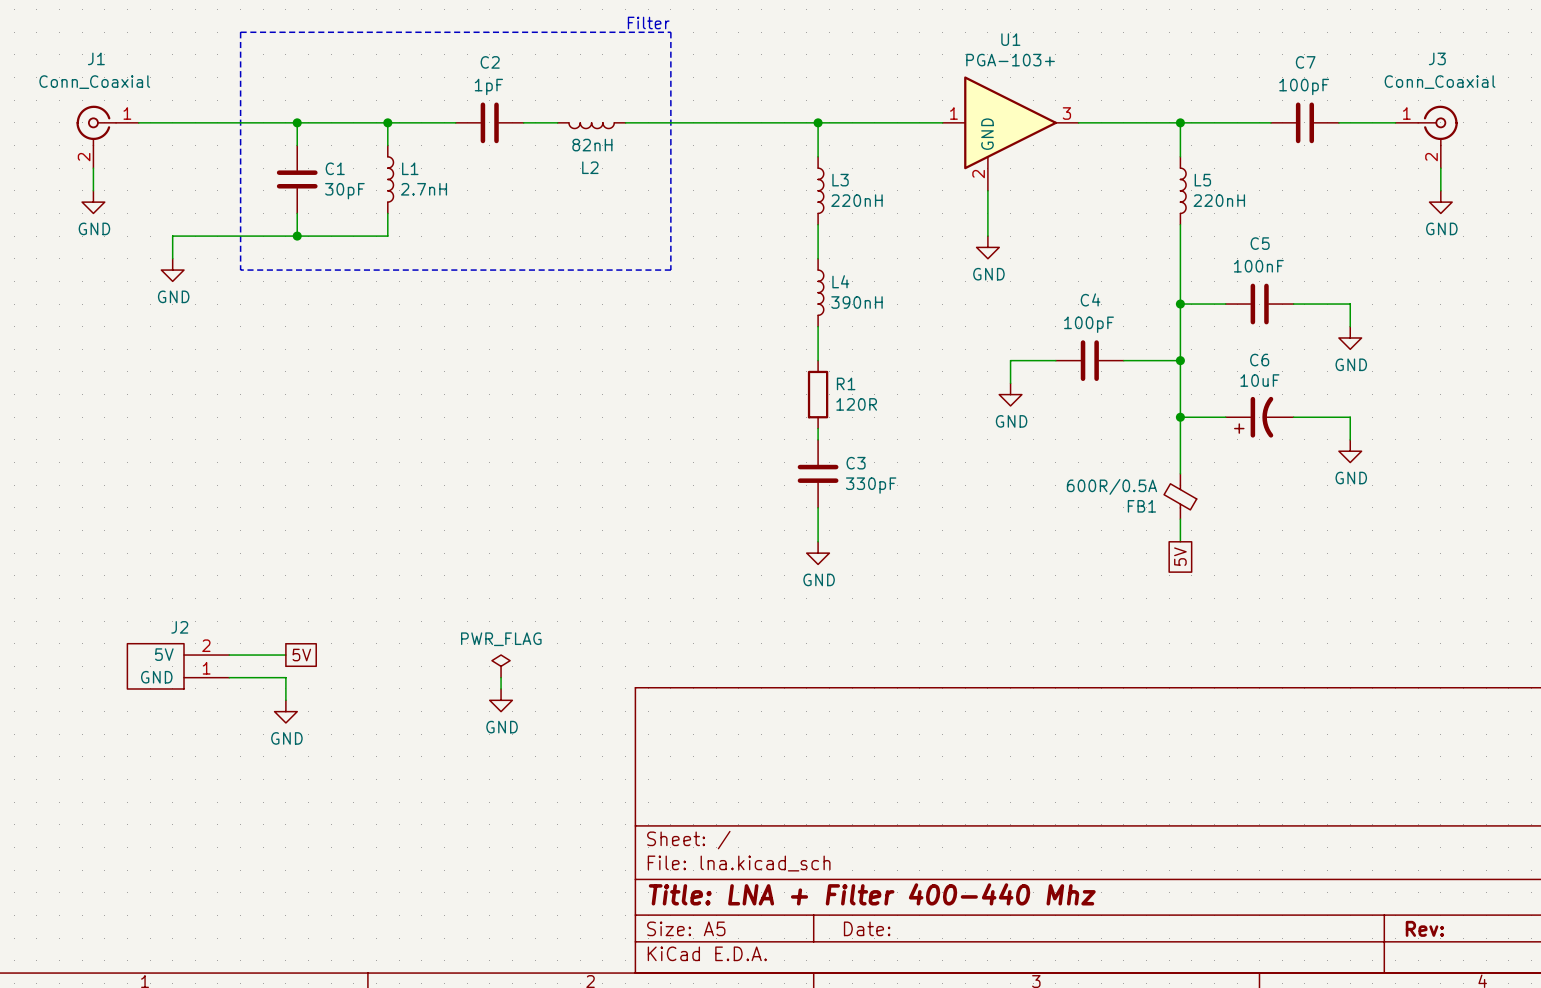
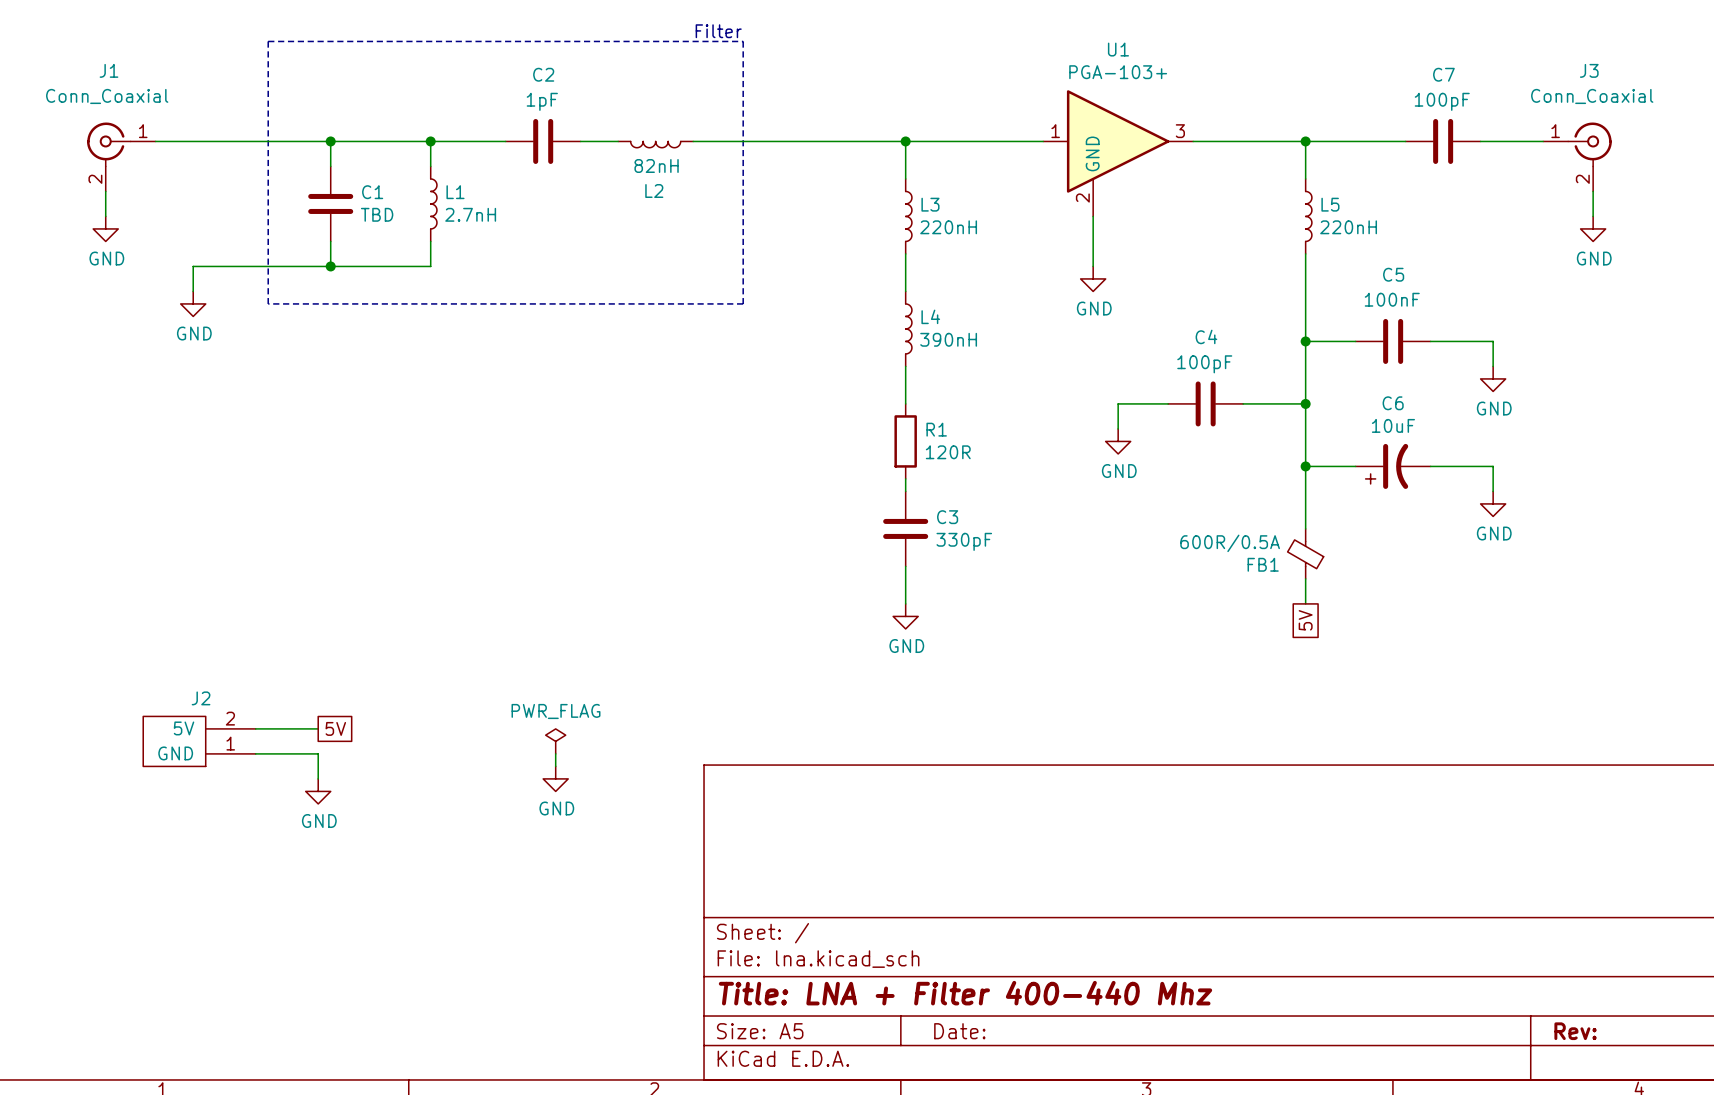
C1 value: 30pF (344, 191) -> TBD (377, 214)

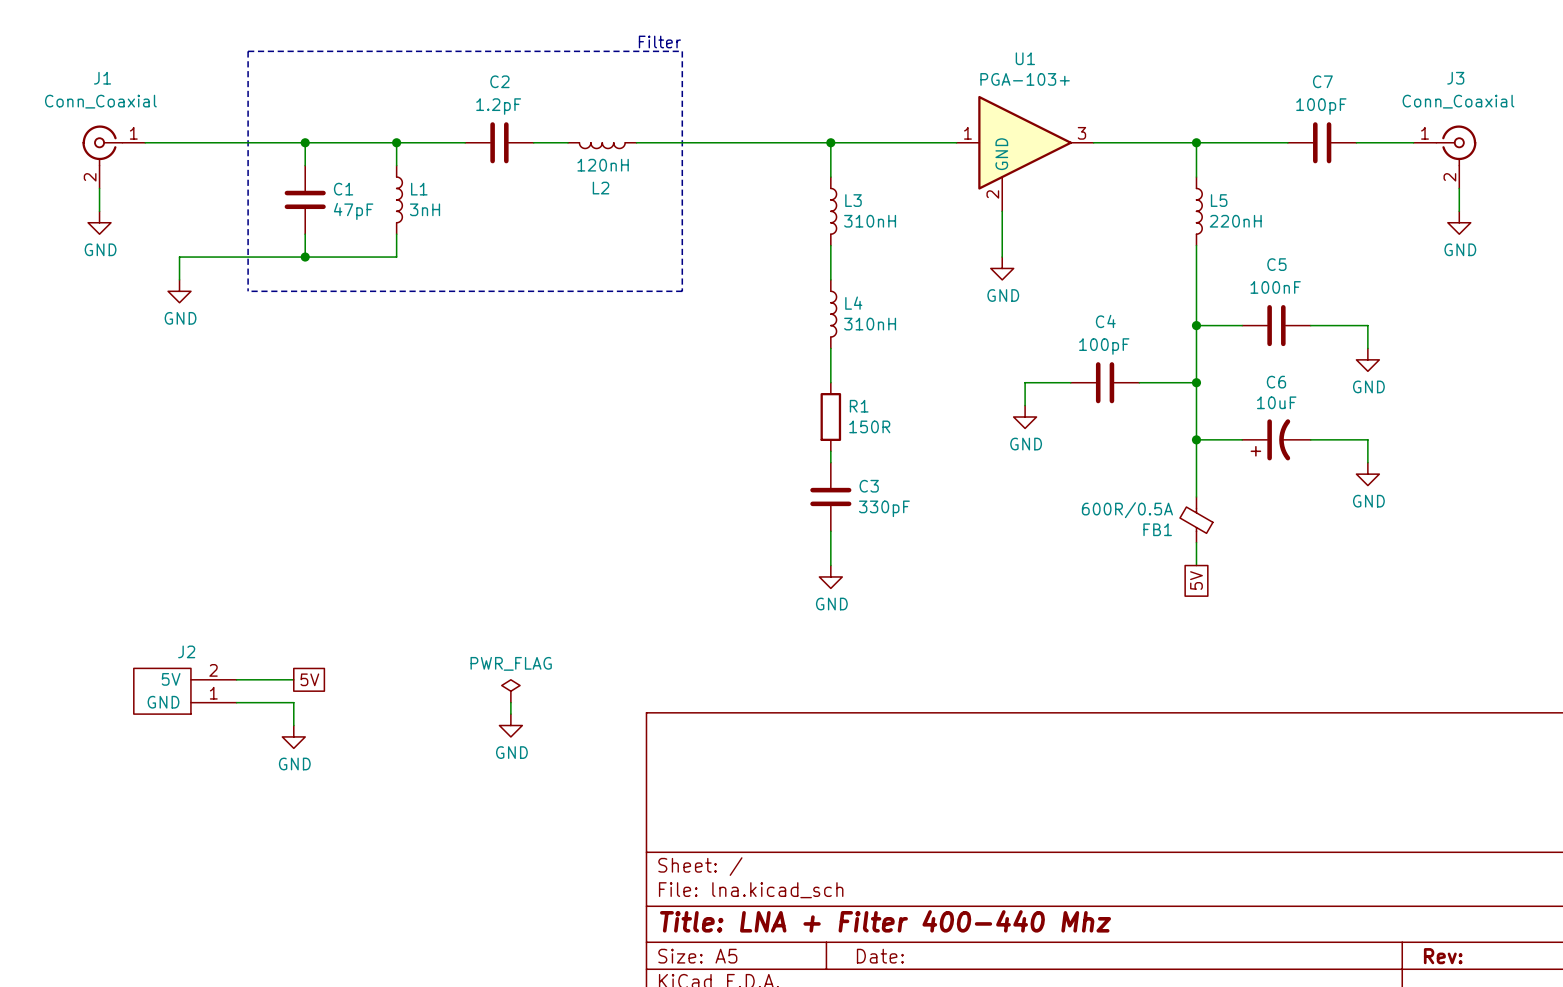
C2 value: 1pF (542, 101) -> 1.2pF (498, 106)
L2 value: 82nH (656, 165) -> 120nH (603, 165)
C1 value: TBD (377, 214) -> 47pF (353, 211)
L1 value: 2.7nH (470, 214) -> 3nH (425, 209)
L3 value: 220nH (948, 227) -> 310nH (870, 221)
L4 value: 390nH (948, 339) -> 310nH (870, 324)
R1 value: 120R (948, 452) -> 150R (869, 426)

